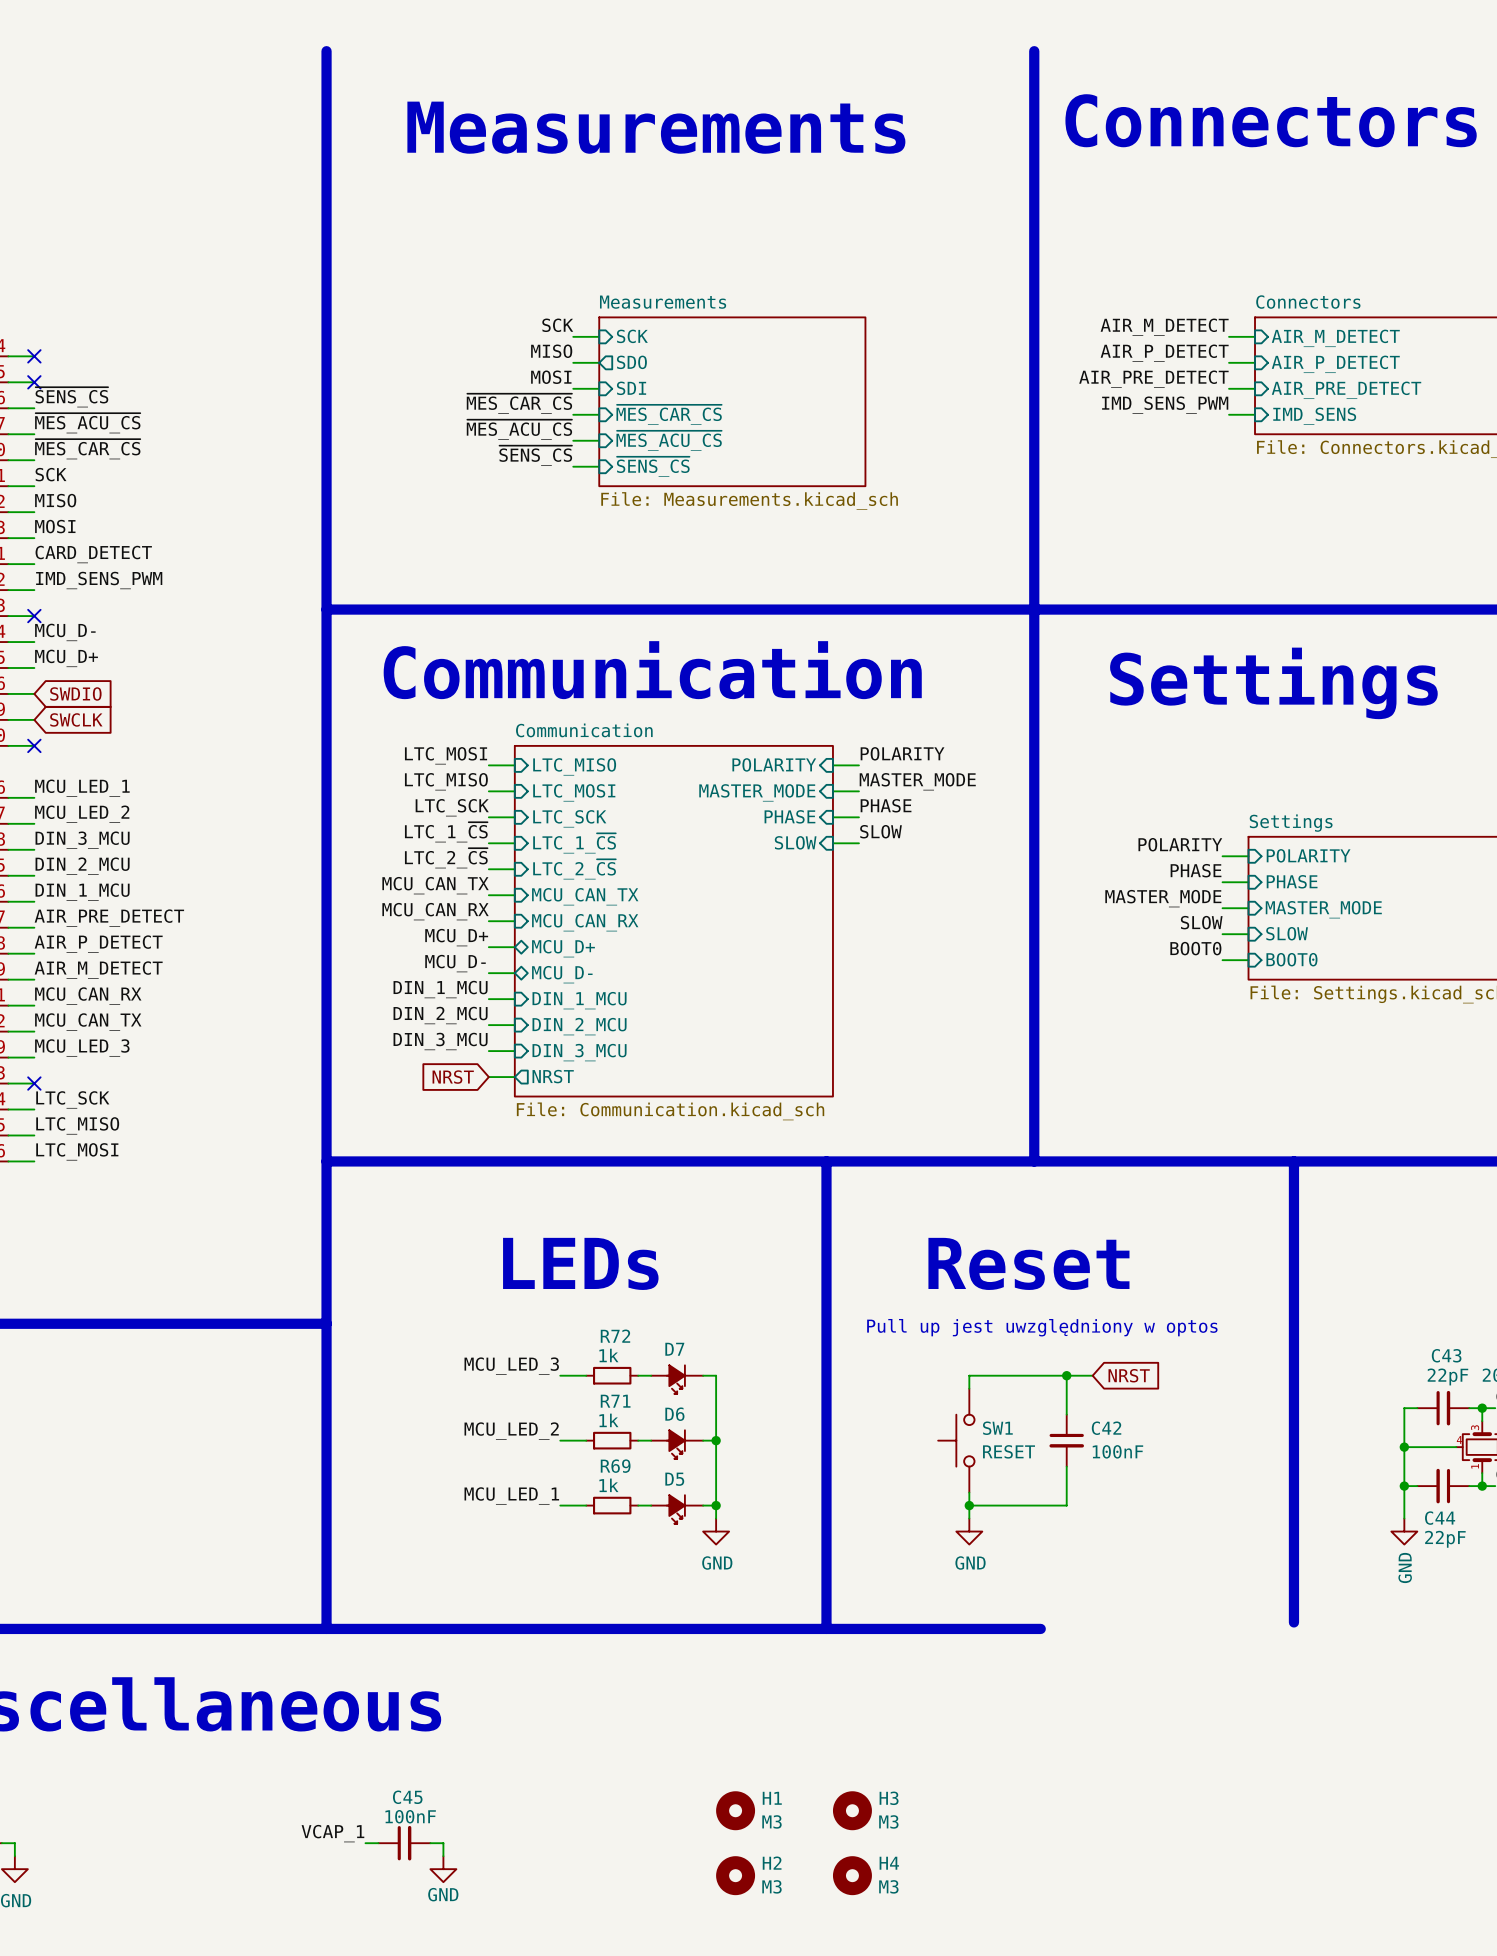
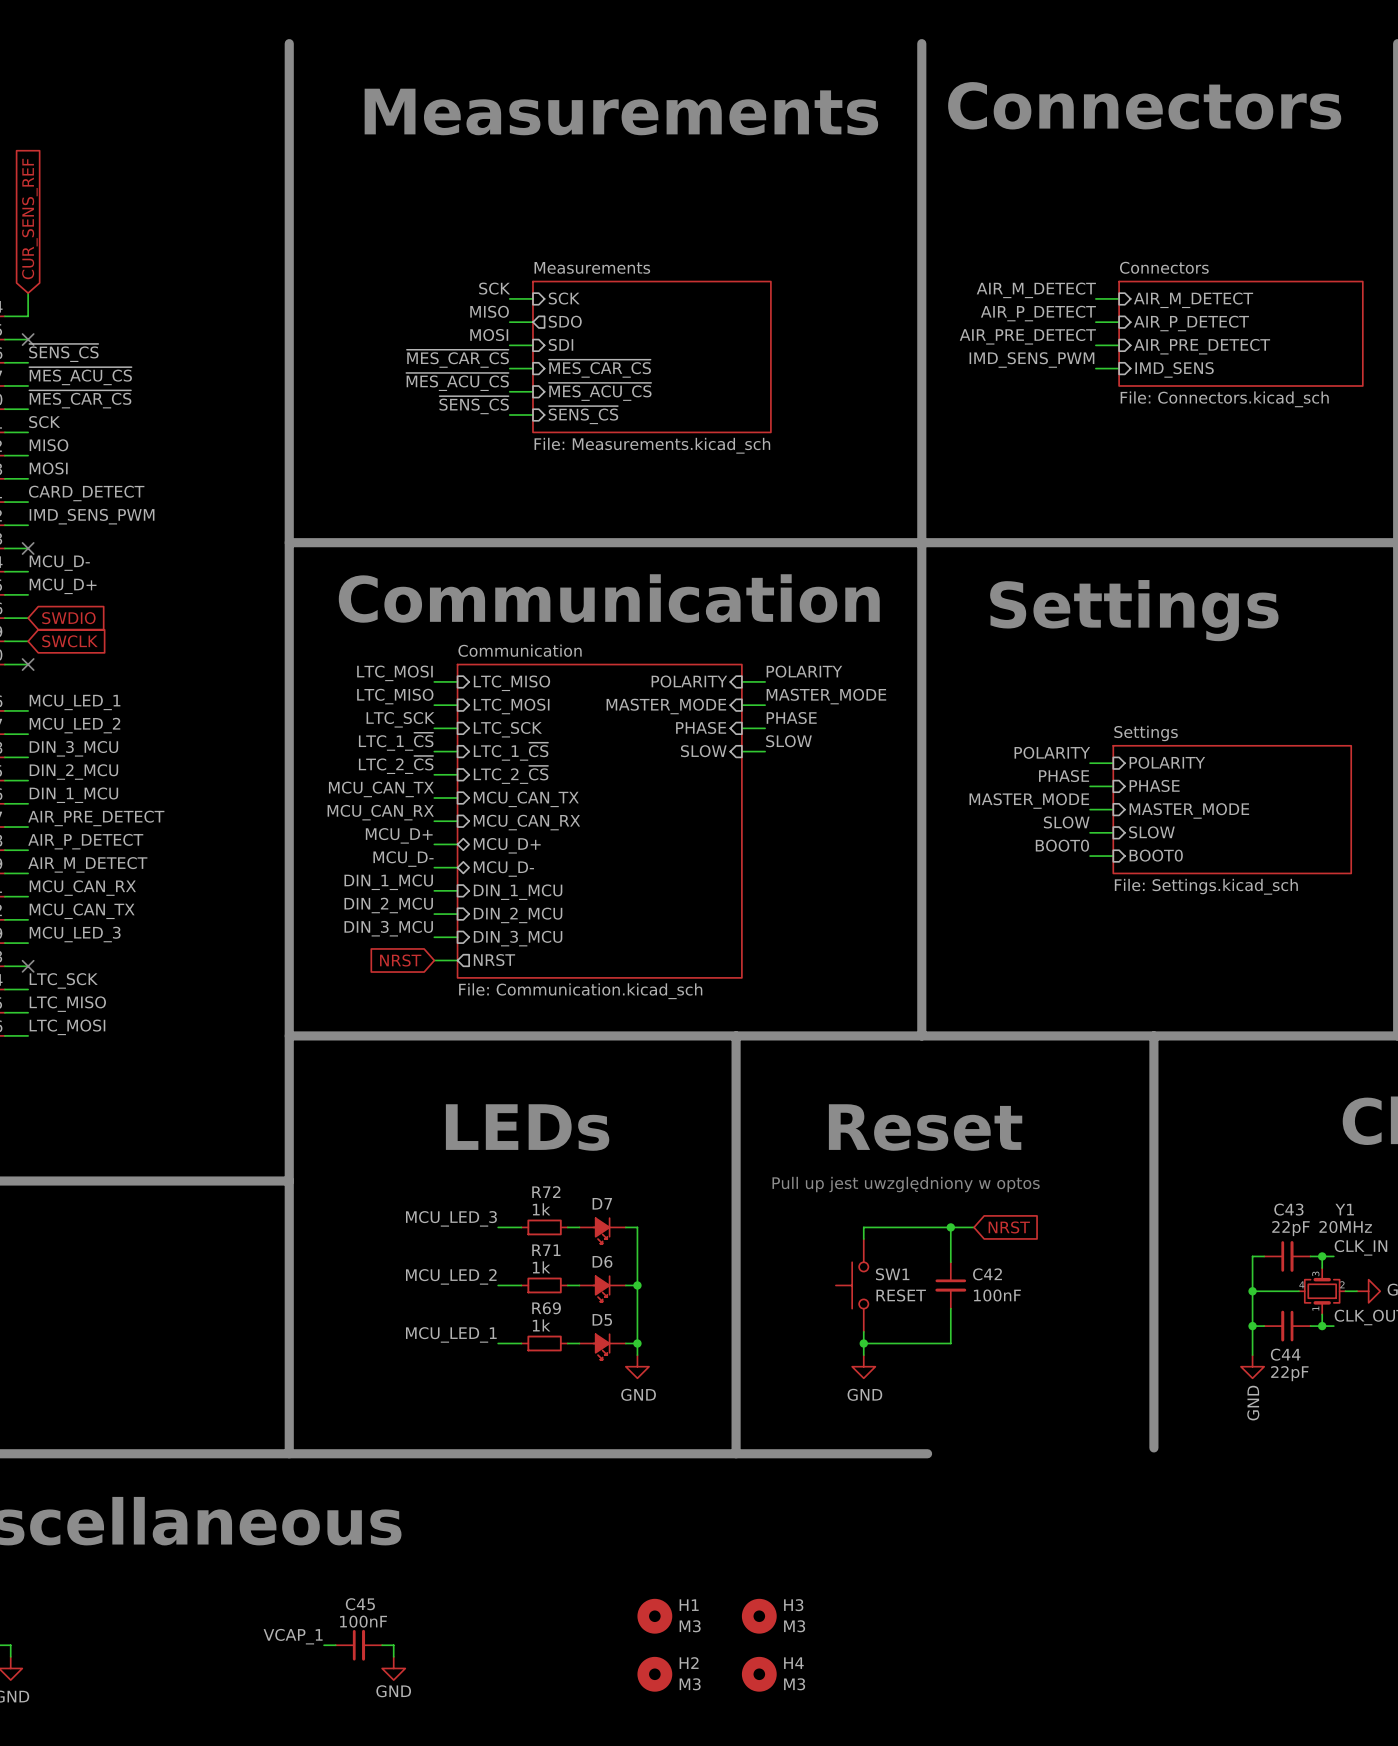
global label: none -> CUR_SENS_REF (29, 219)
wire: none -> (28, 293) (28, 316)
no-connect mark: (34, 356) -> none

